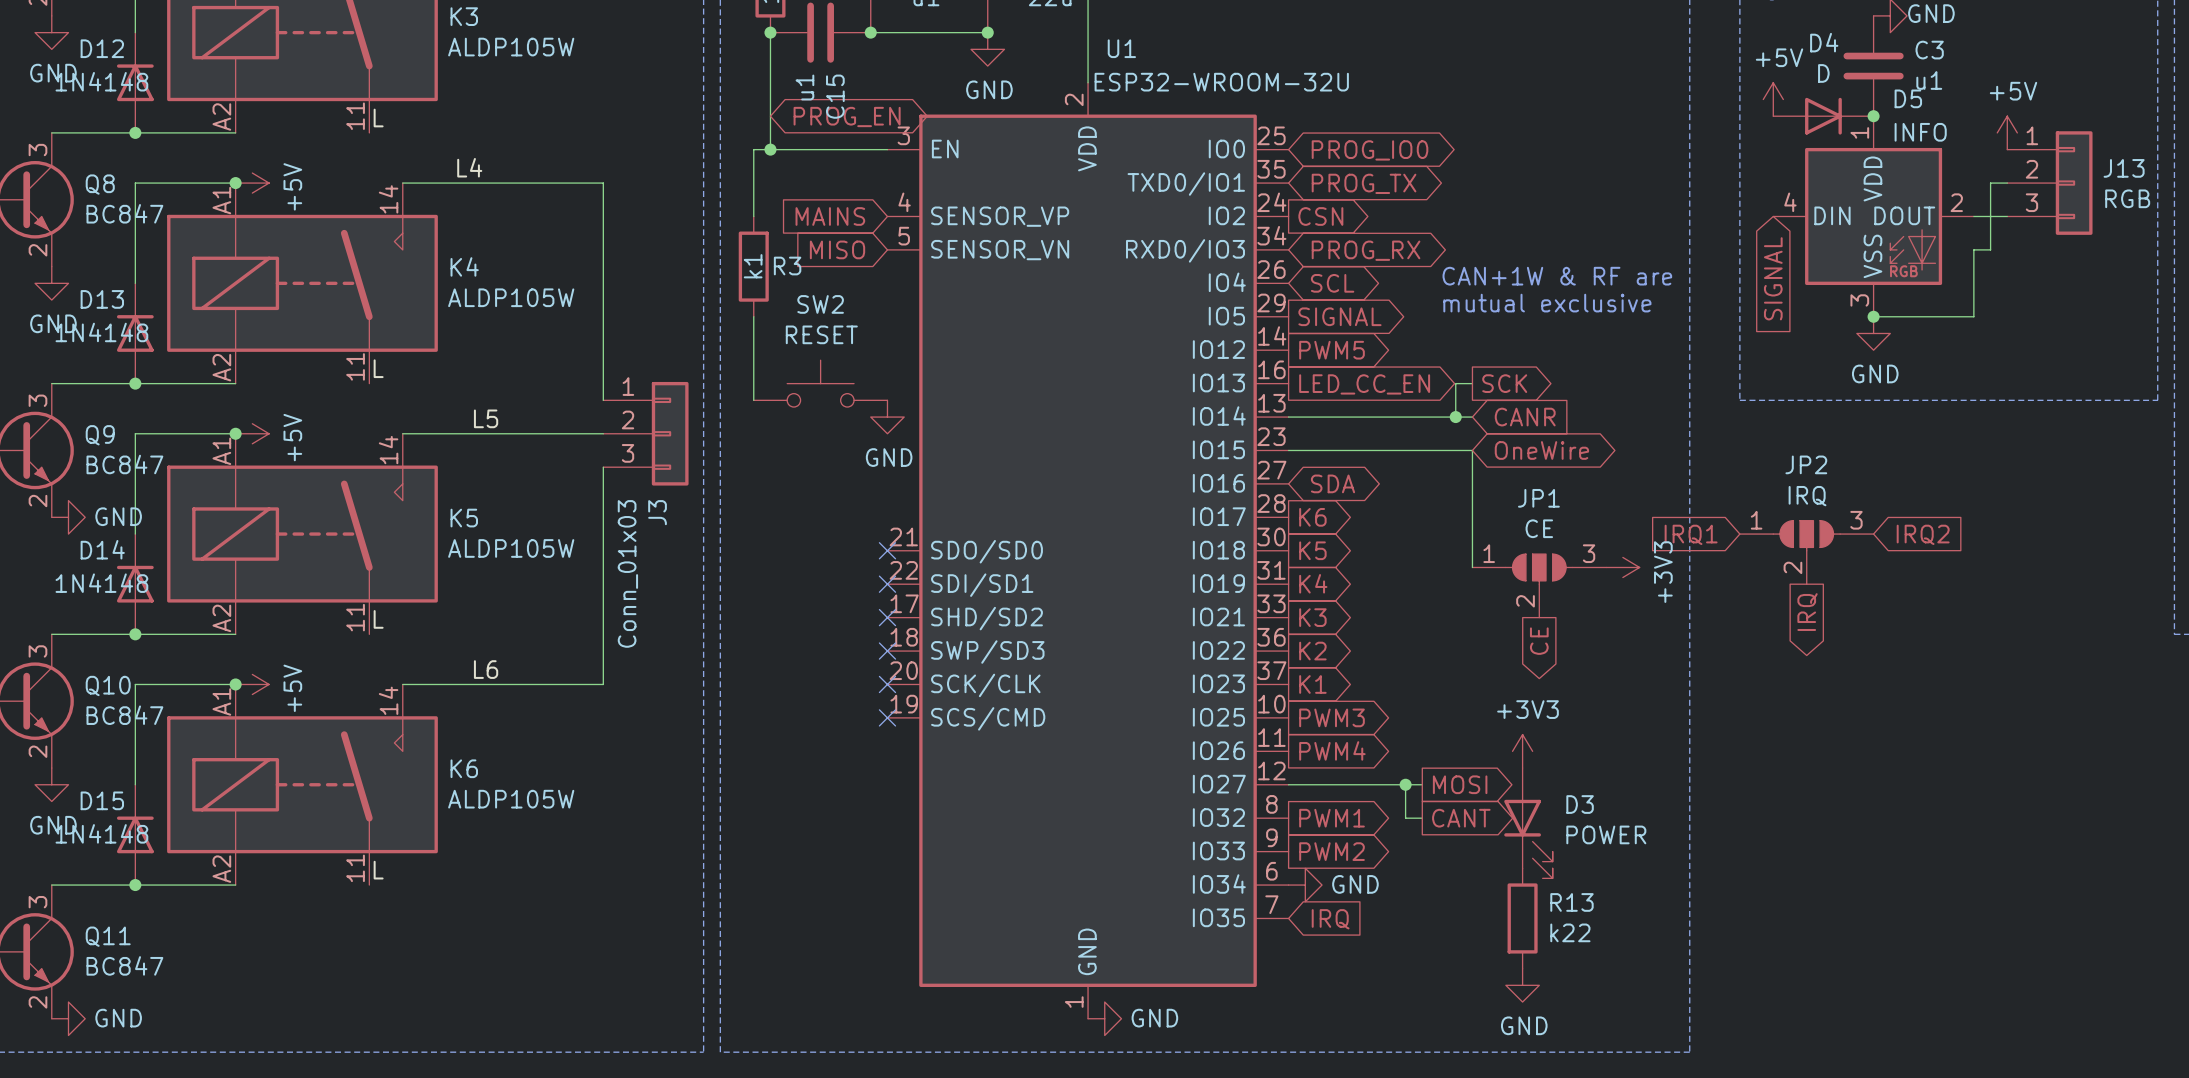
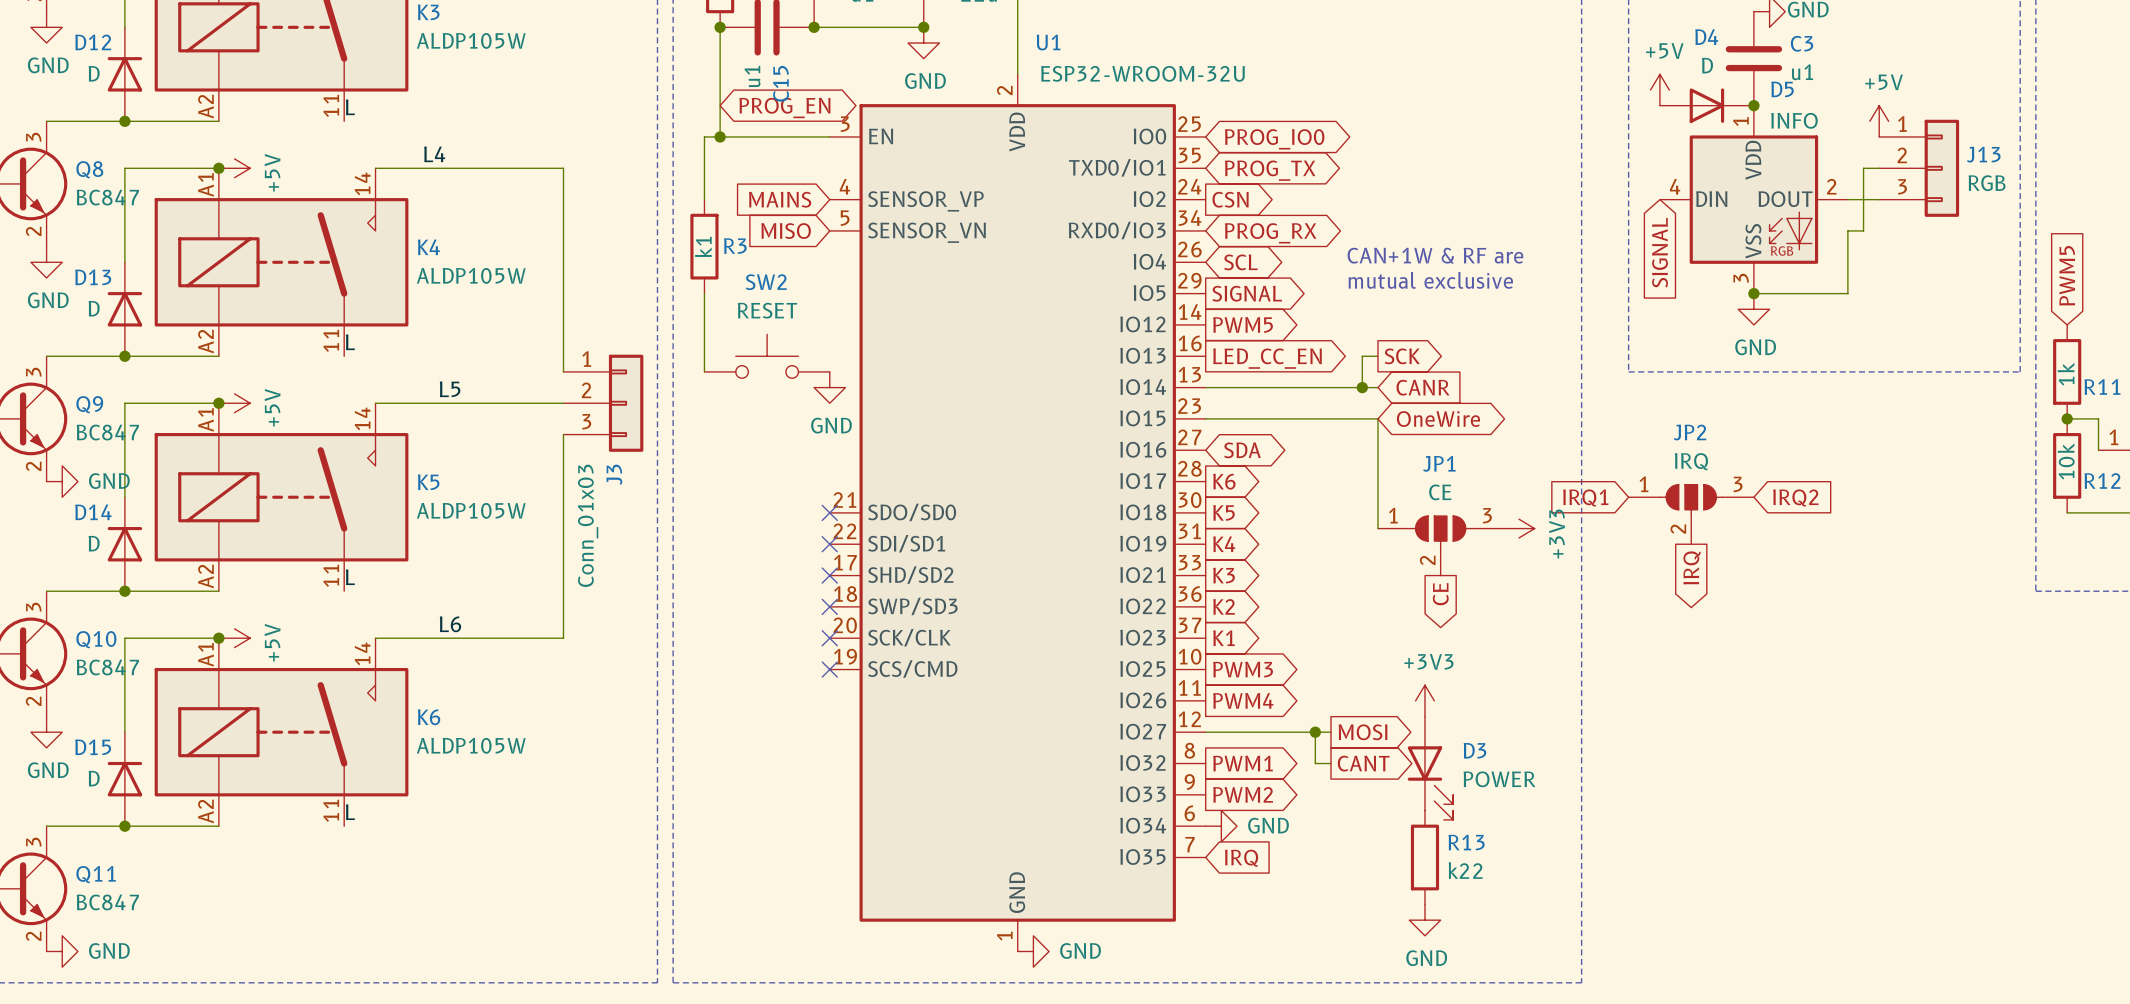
D12 value: 1N4148 (101, 81) -> D (94, 73)
D13 value: 1N4148 (101, 332) -> D (94, 308)
D14 value: 1N4148 (101, 583) -> D (94, 543)
D15 value: 1N4148 (101, 833) -> D (94, 778)

